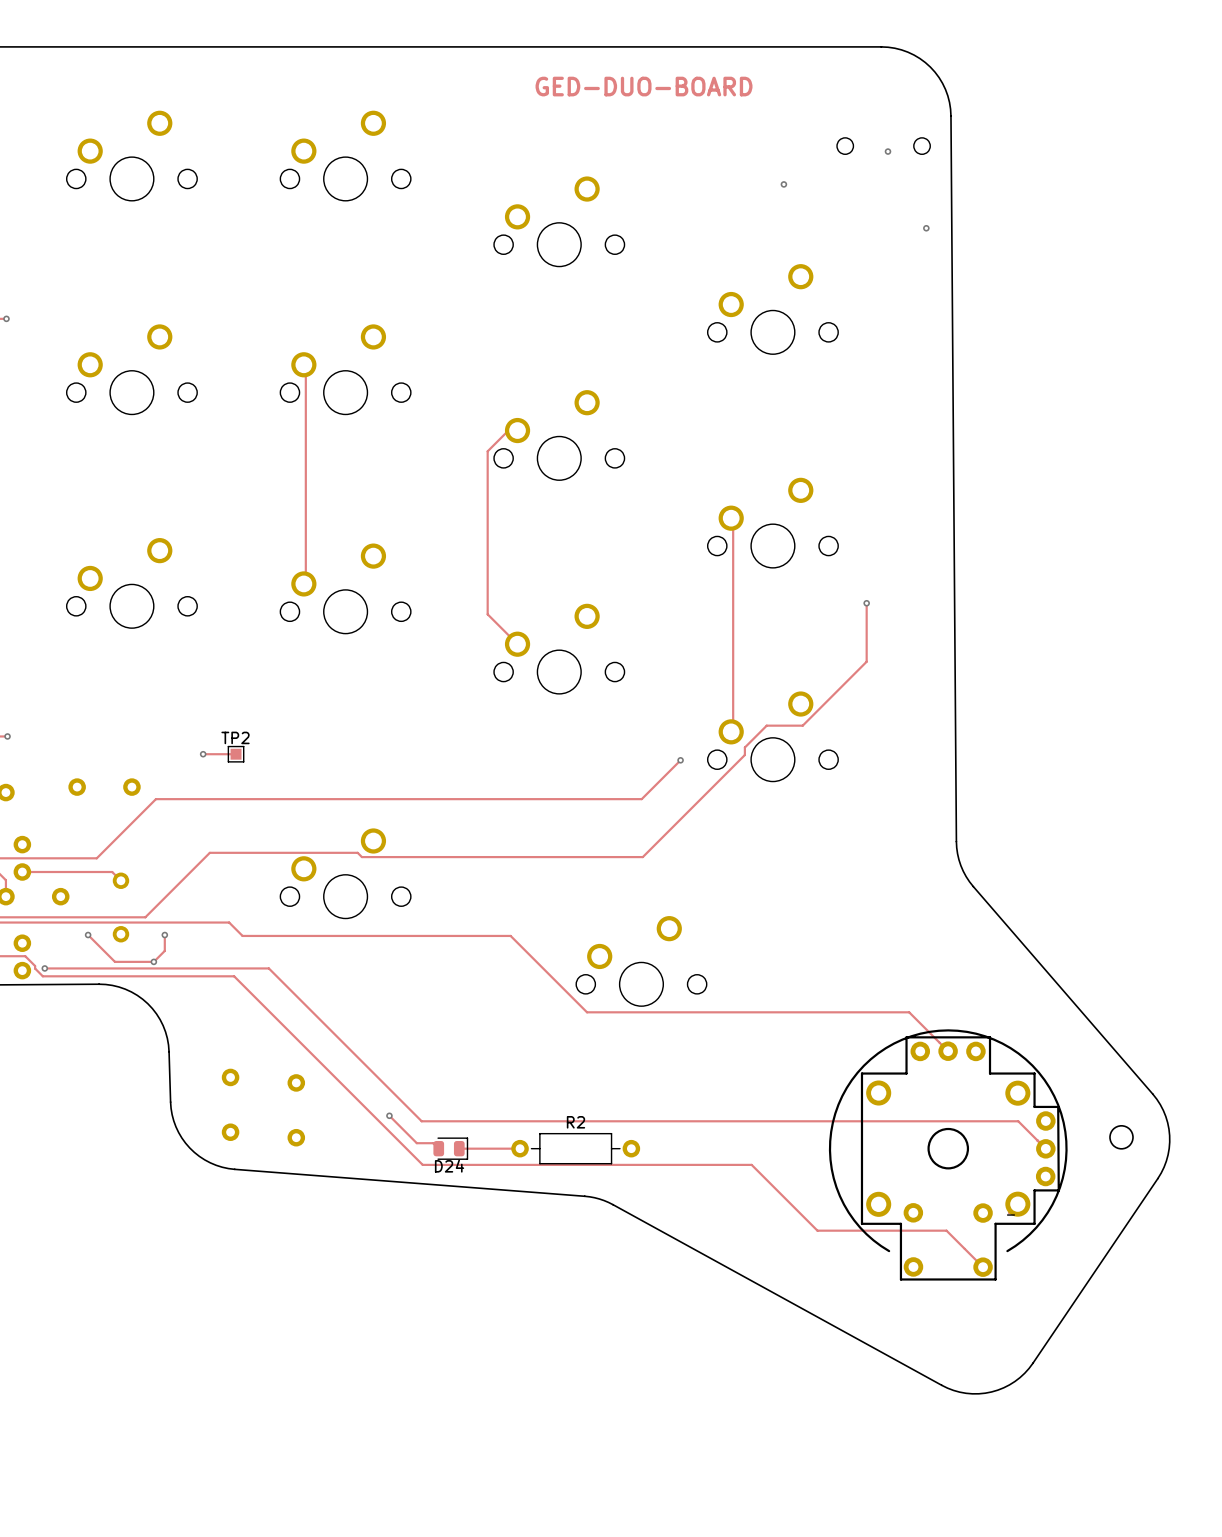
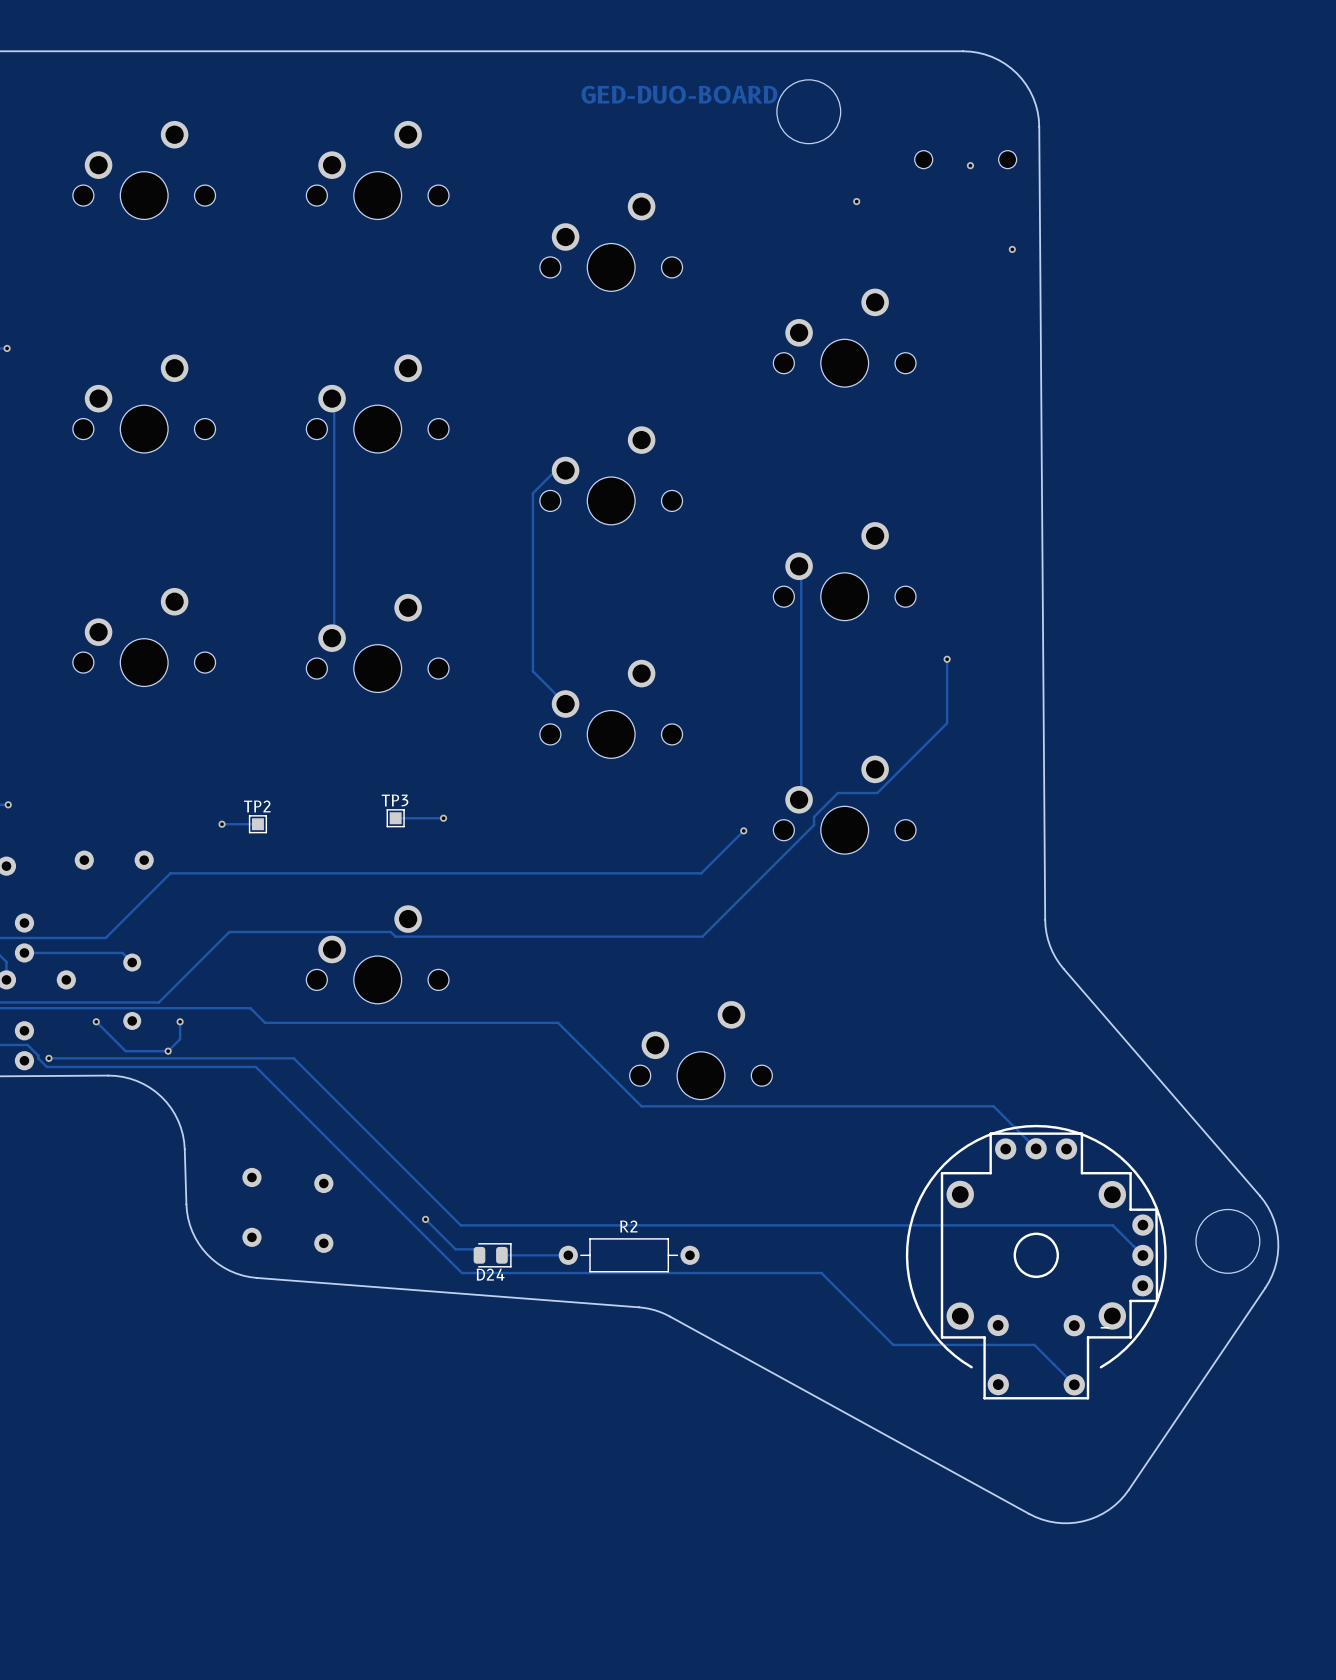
round board edge: none -> [776, 79, 841, 144]
track: none -> (395, 818) (443, 818)
TP3: none -> (395, 818)
via: none -> (443, 818)
round board edge size: [1109, 1125, 1134, 1150] -> [1195, 1209, 1261, 1274]

